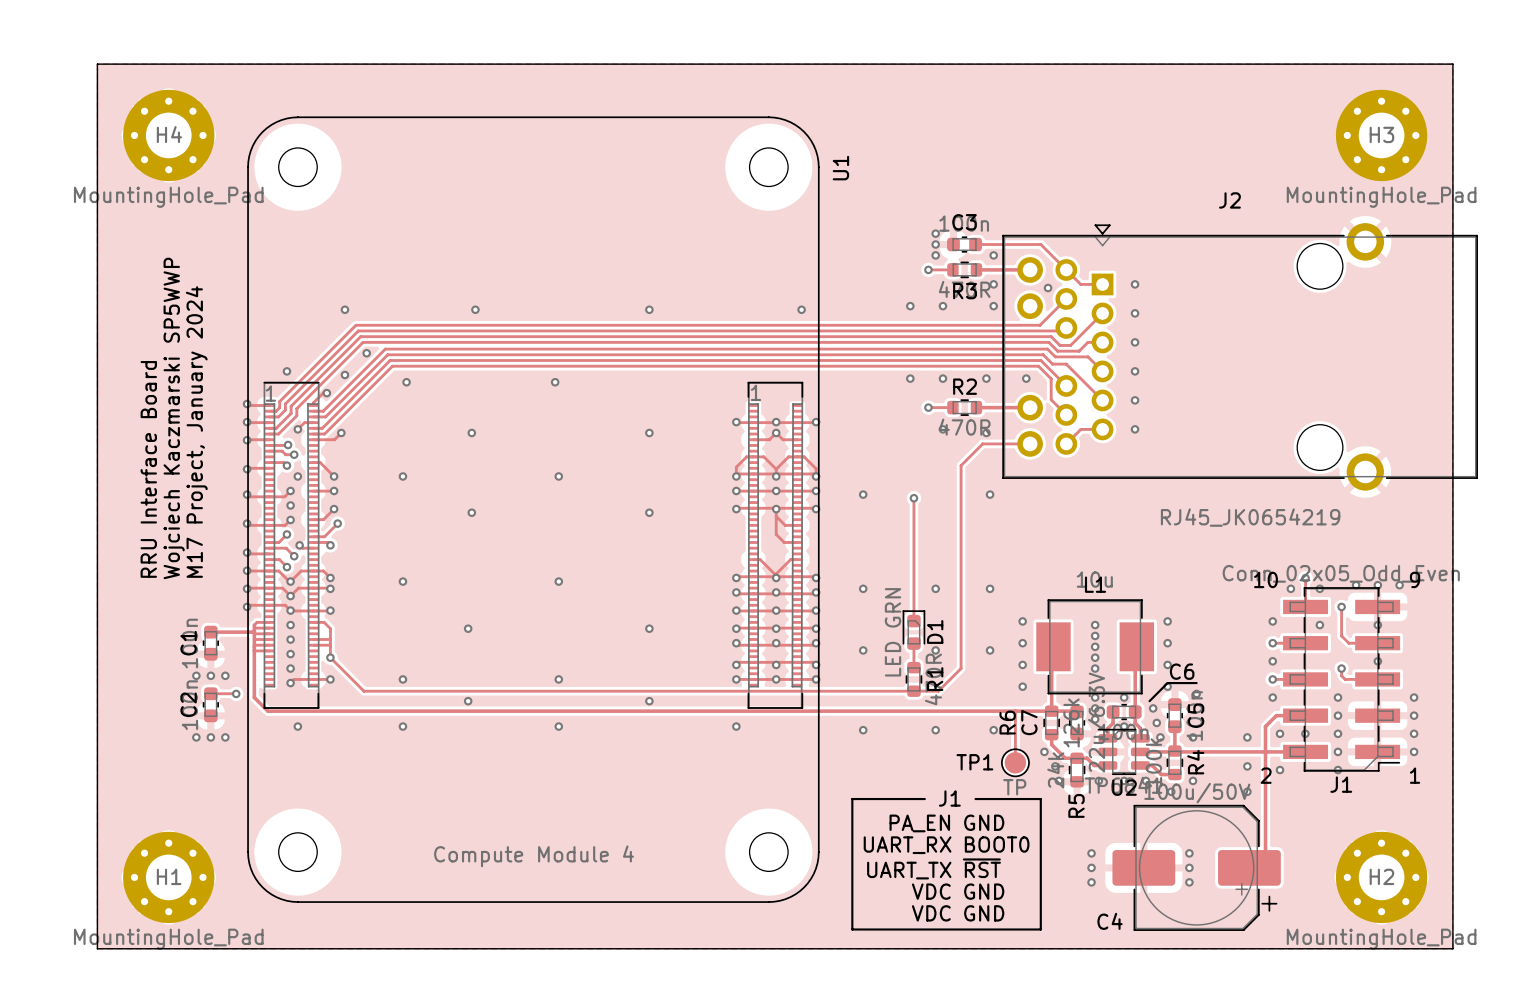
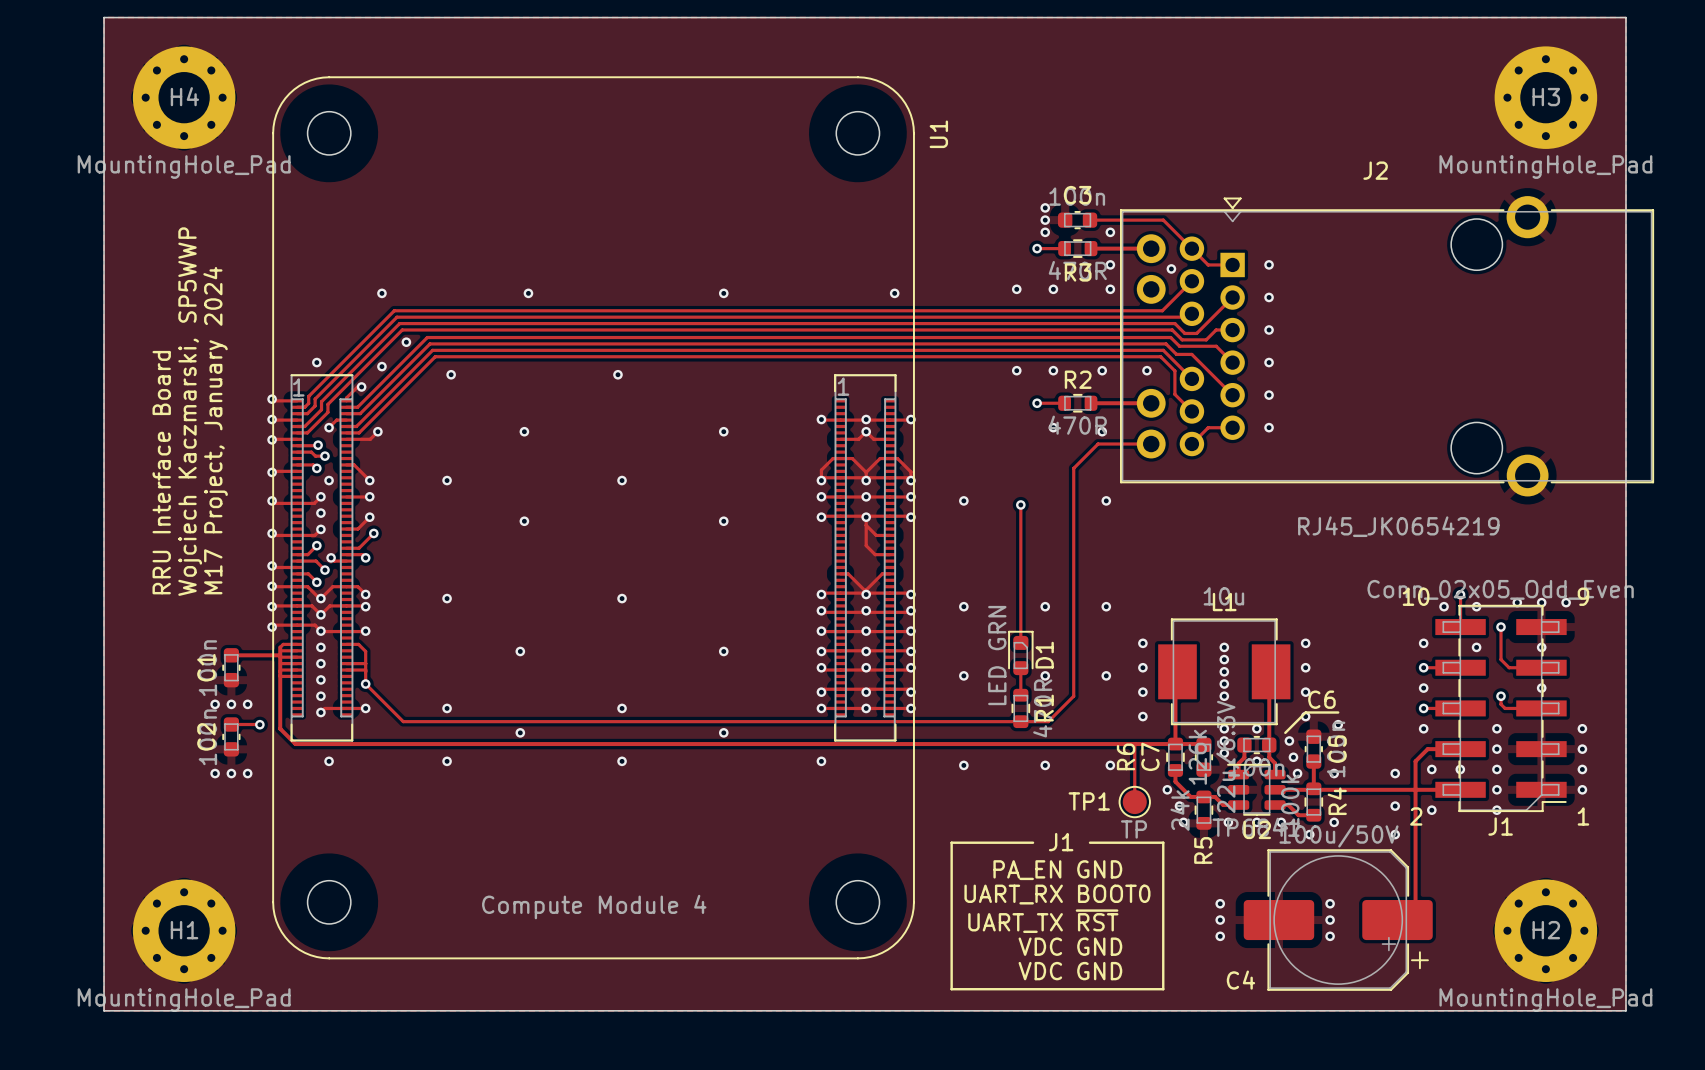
text: Wojciech Kaczmarski SP5WWP (174, 418) -> Wojciech Kaczmarski, SP5WWP (190, 411)

